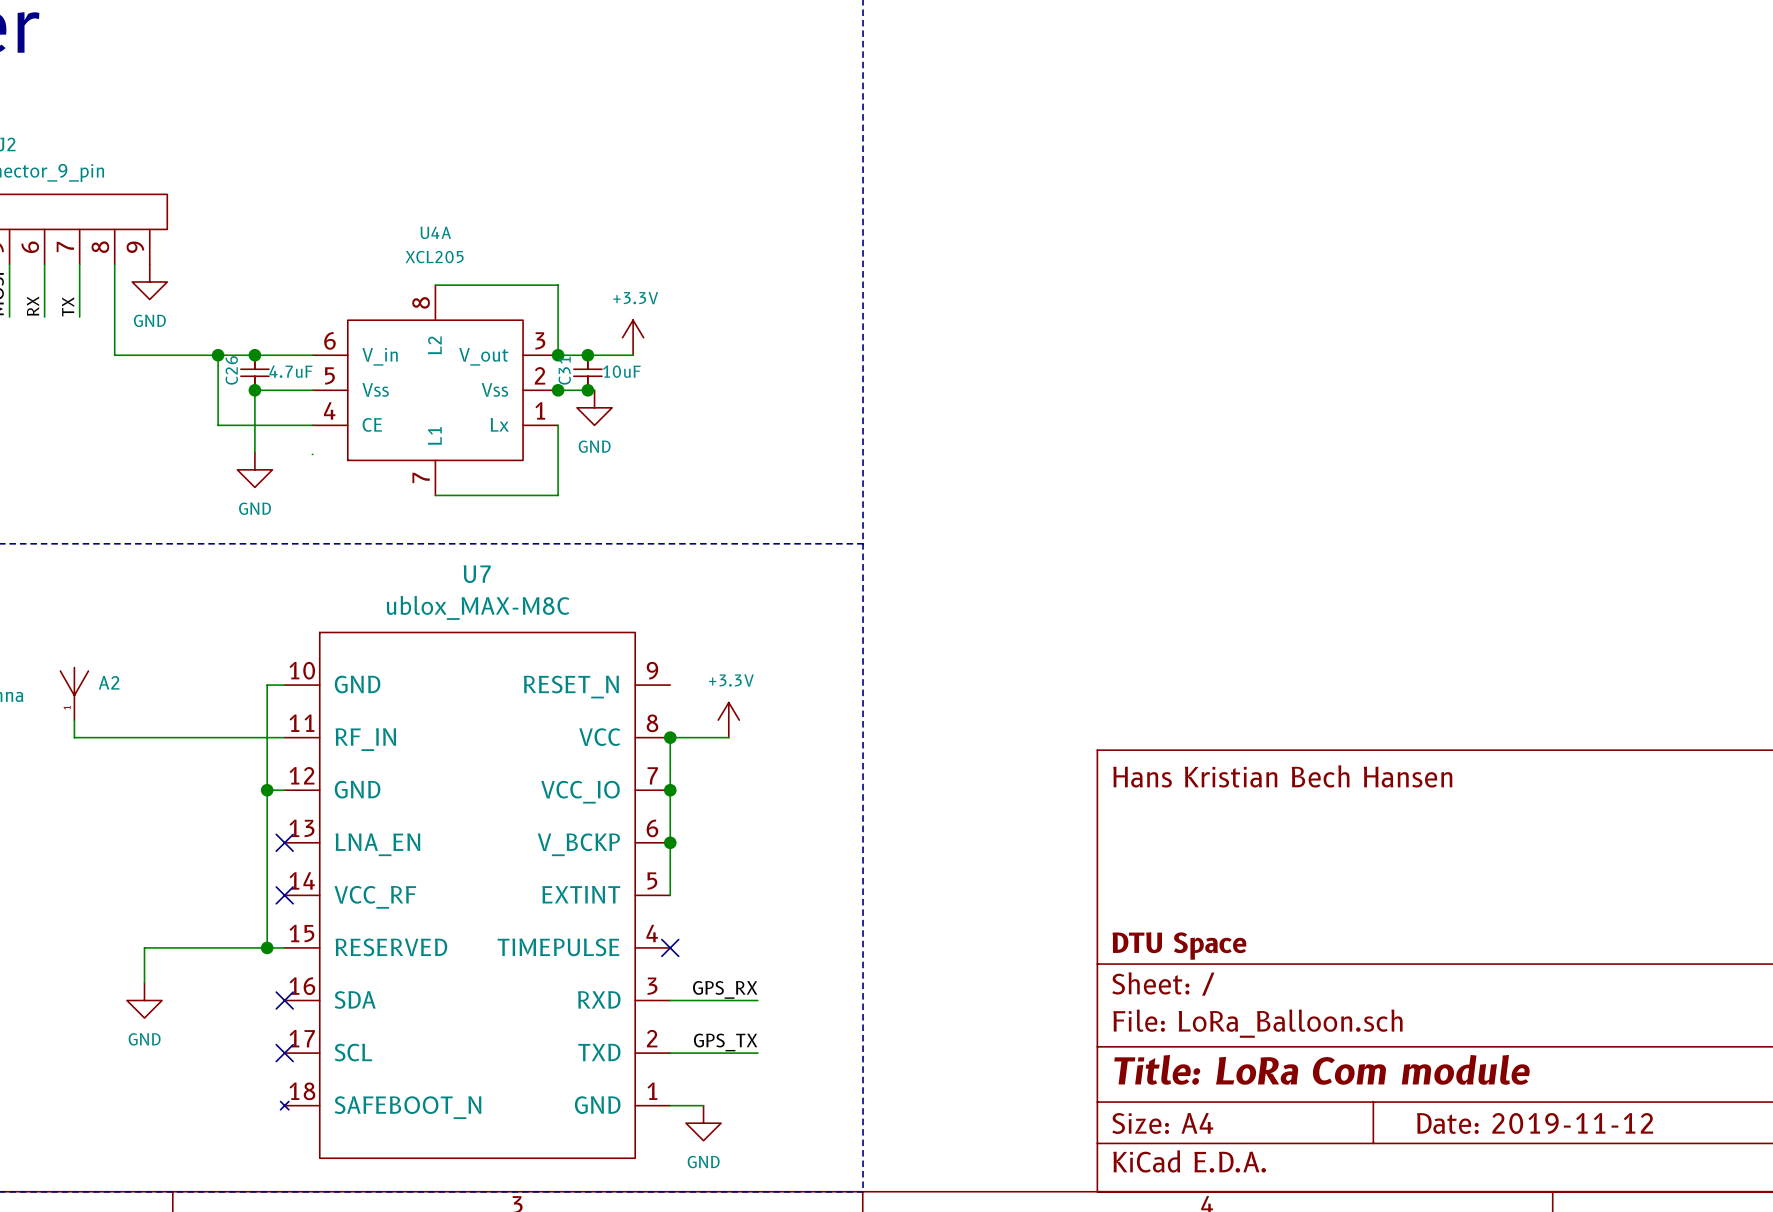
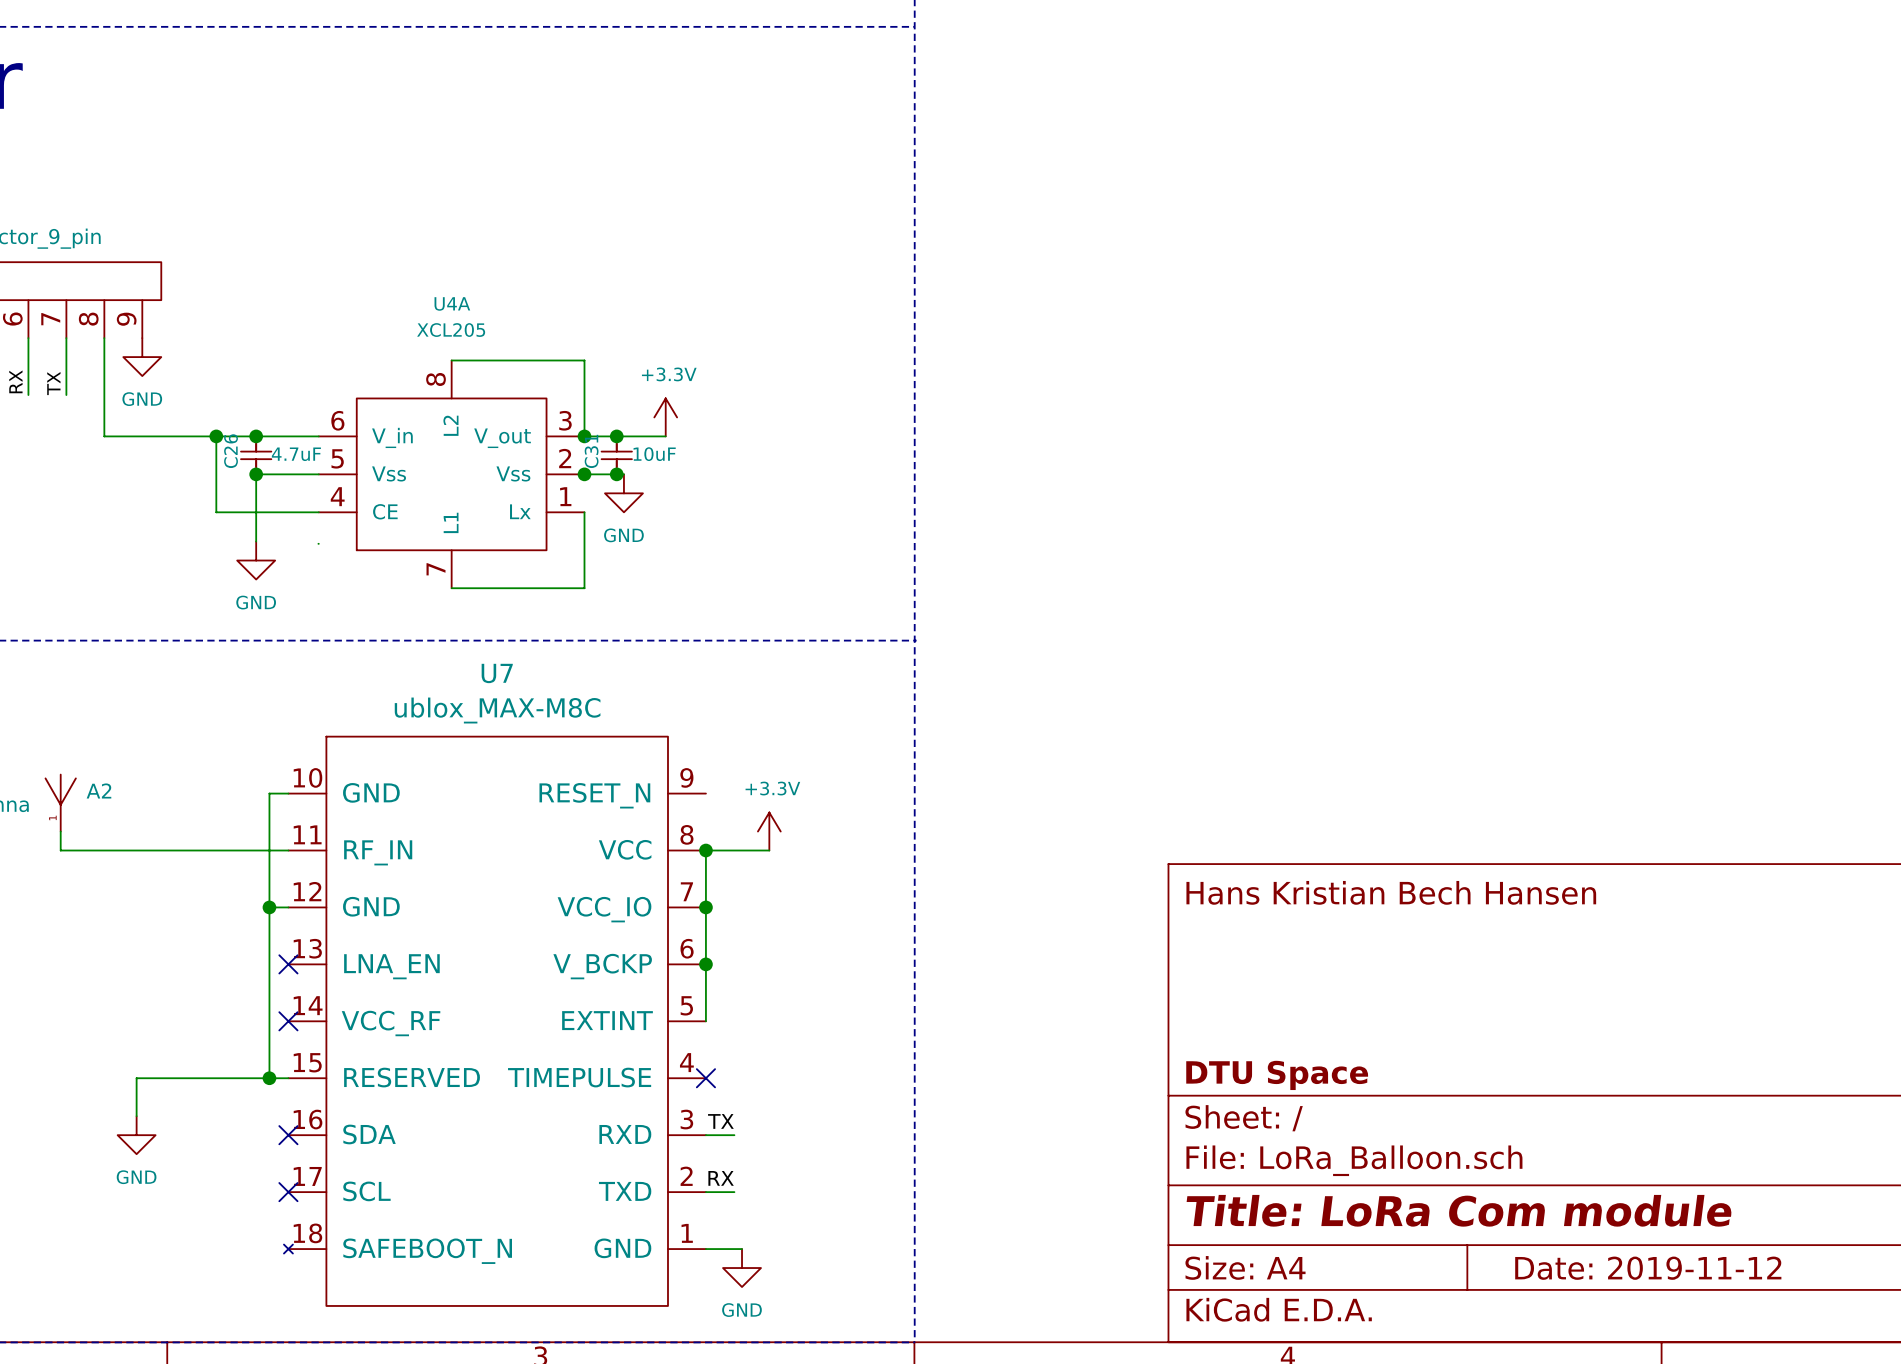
label: none -> TX (720, 1121)
label: GPS_RX (725, 989) -> none
wire: (696, 1000) (757, 1000) -> none
label: none -> RX (721, 1178)
label: GPS_TX (725, 1042) -> none
wire: (696, 1053) (757, 1053) -> none

